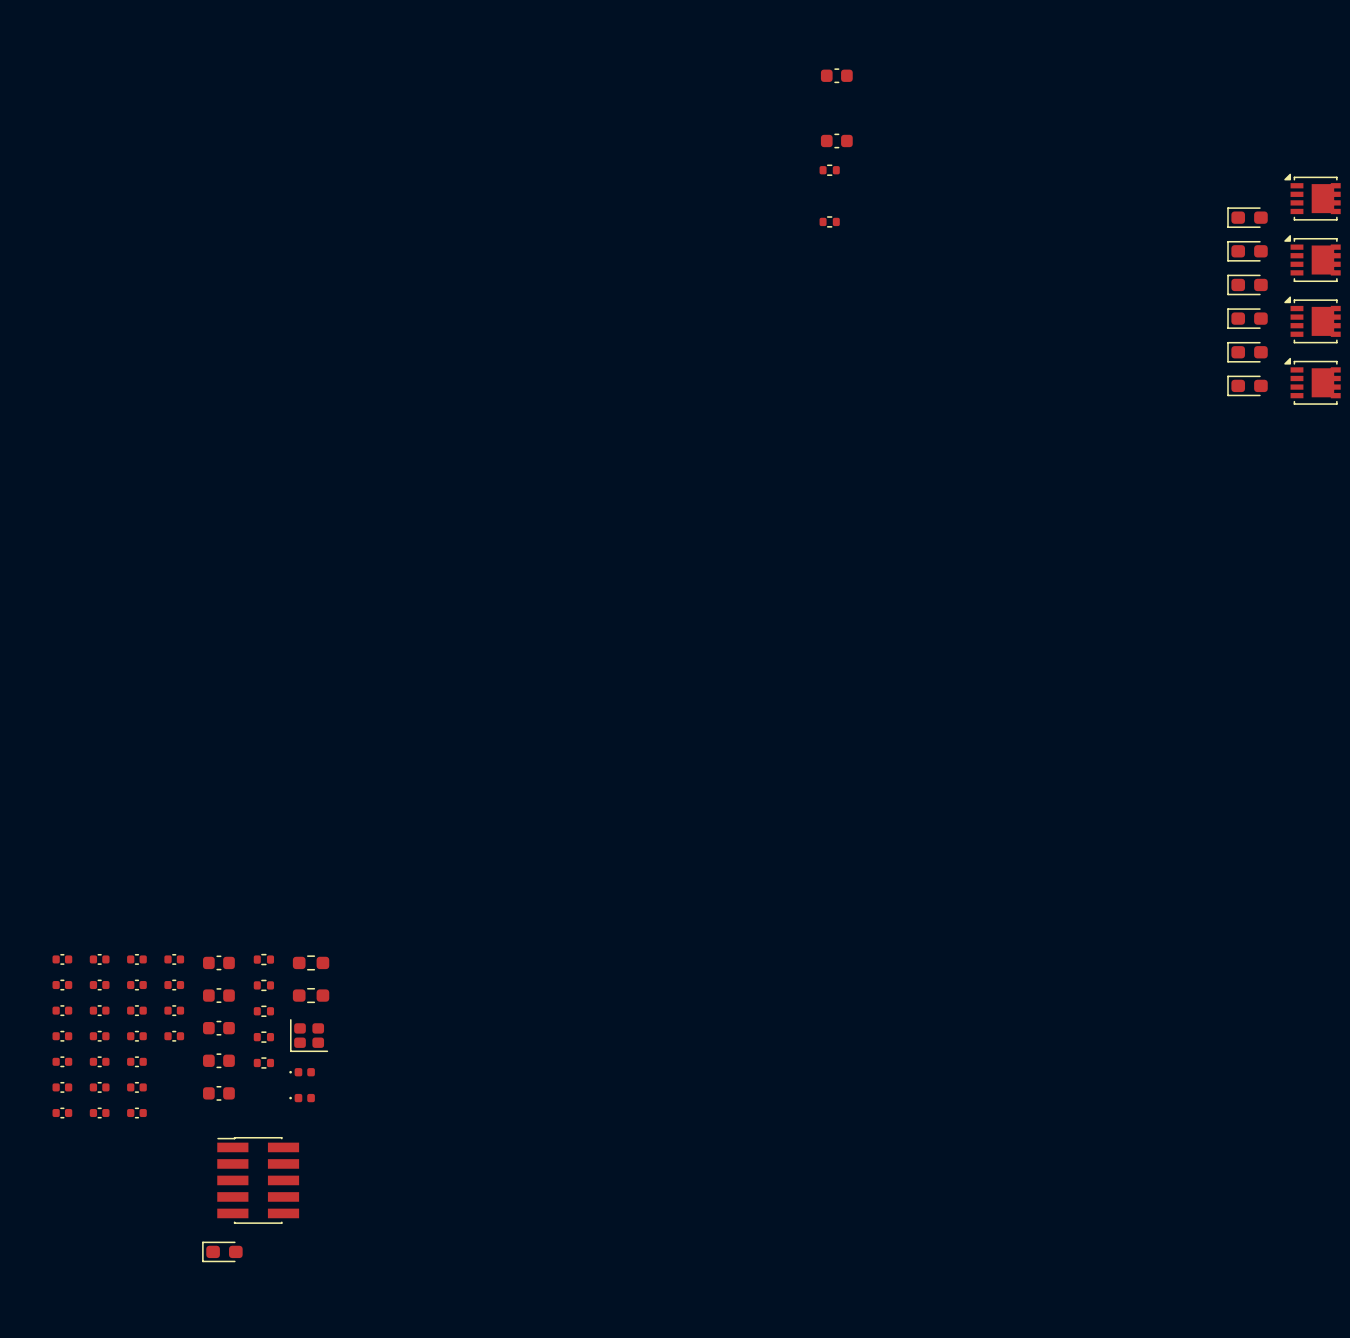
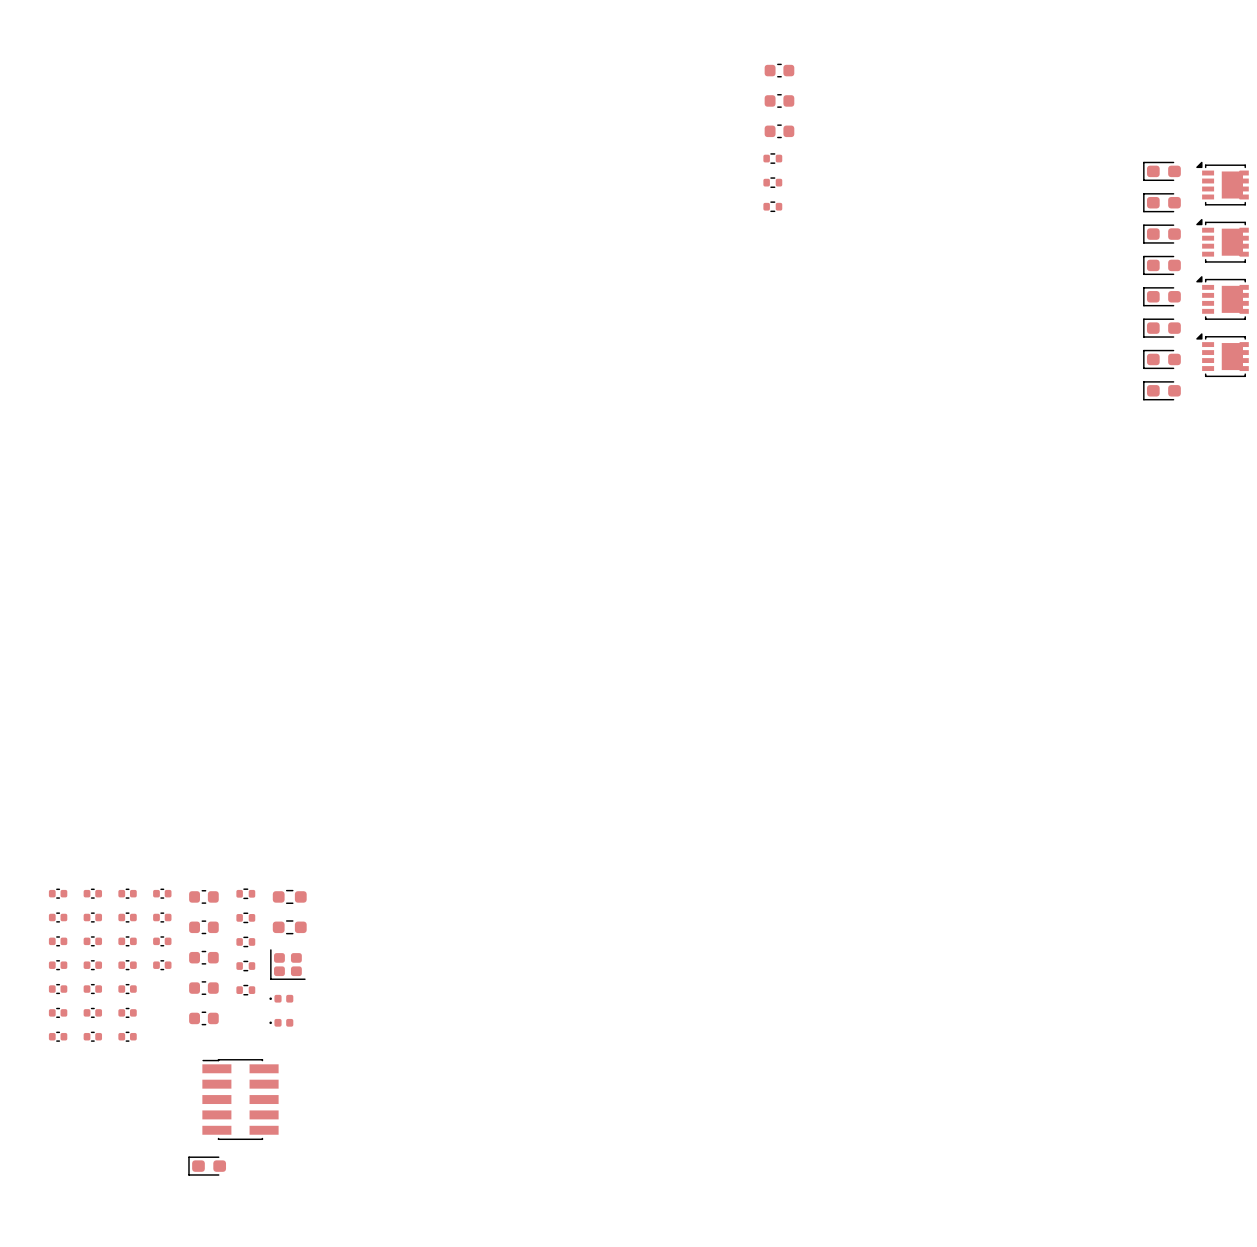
part: none -> (779, 100)
part: none -> (1161, 171)
part: none -> (772, 182)
part: none -> (1161, 390)

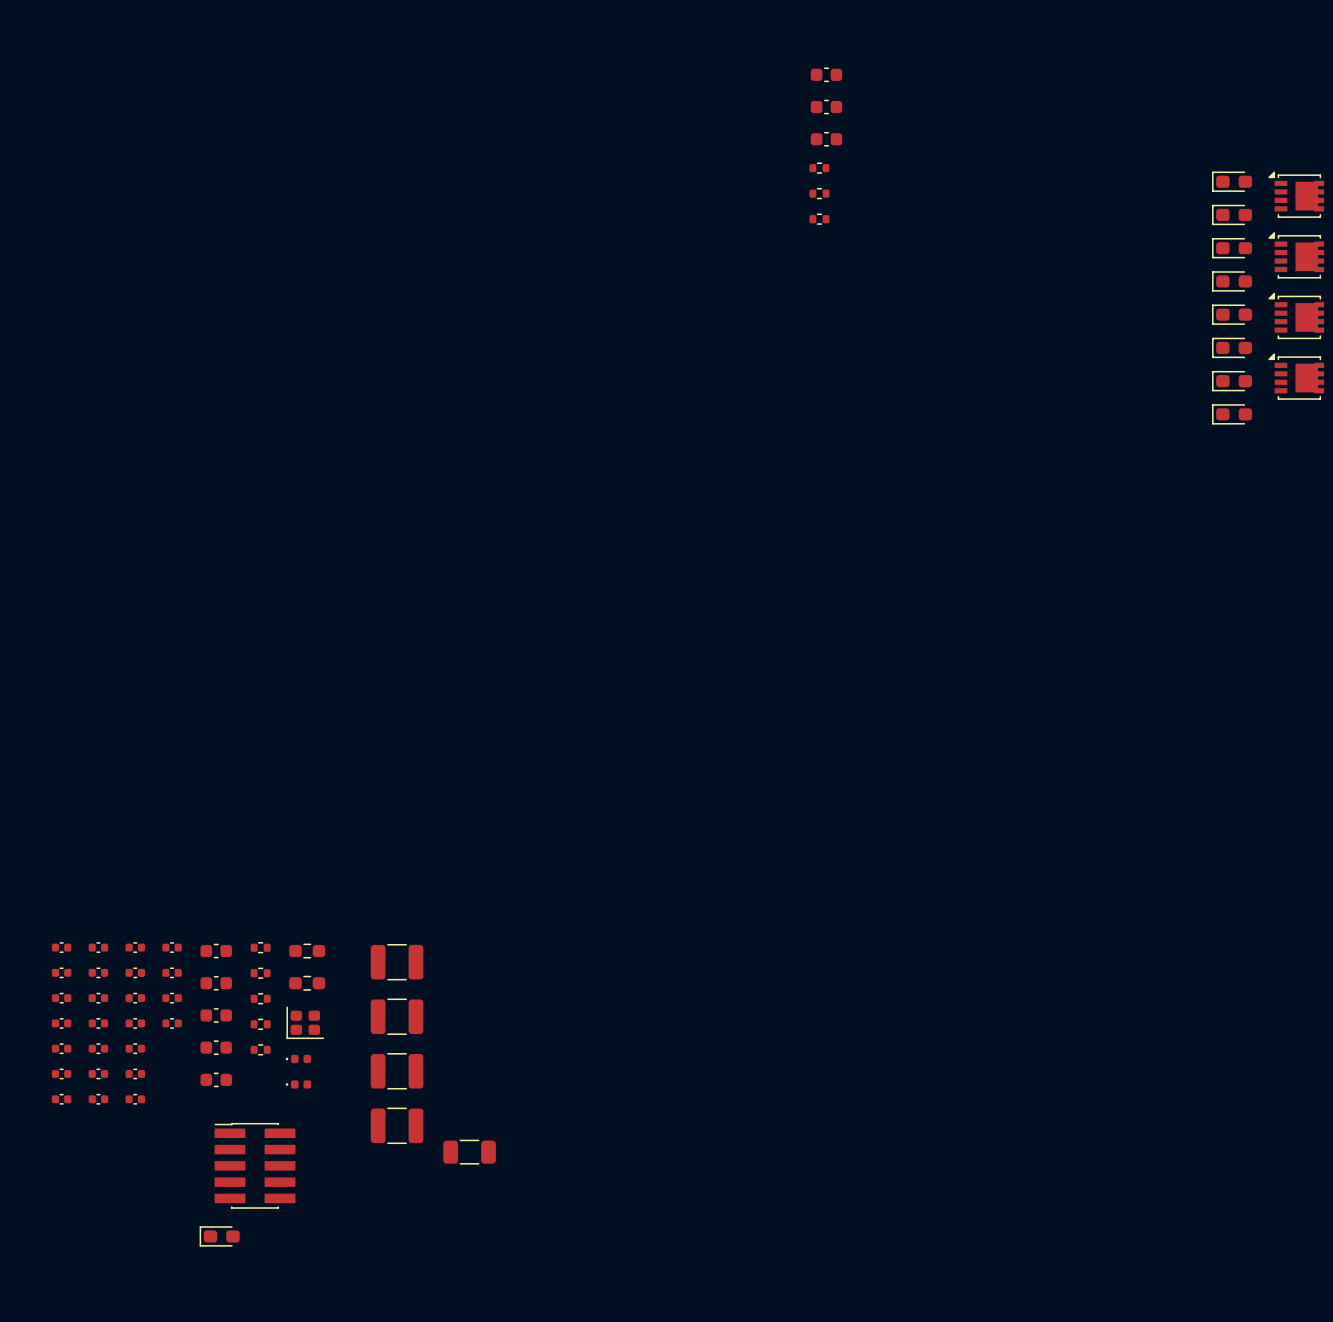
part: none -> (397, 962)
part: none -> (397, 1016)
part: none -> (397, 1071)
part: none -> (397, 1125)
part: none -> (469, 1152)

